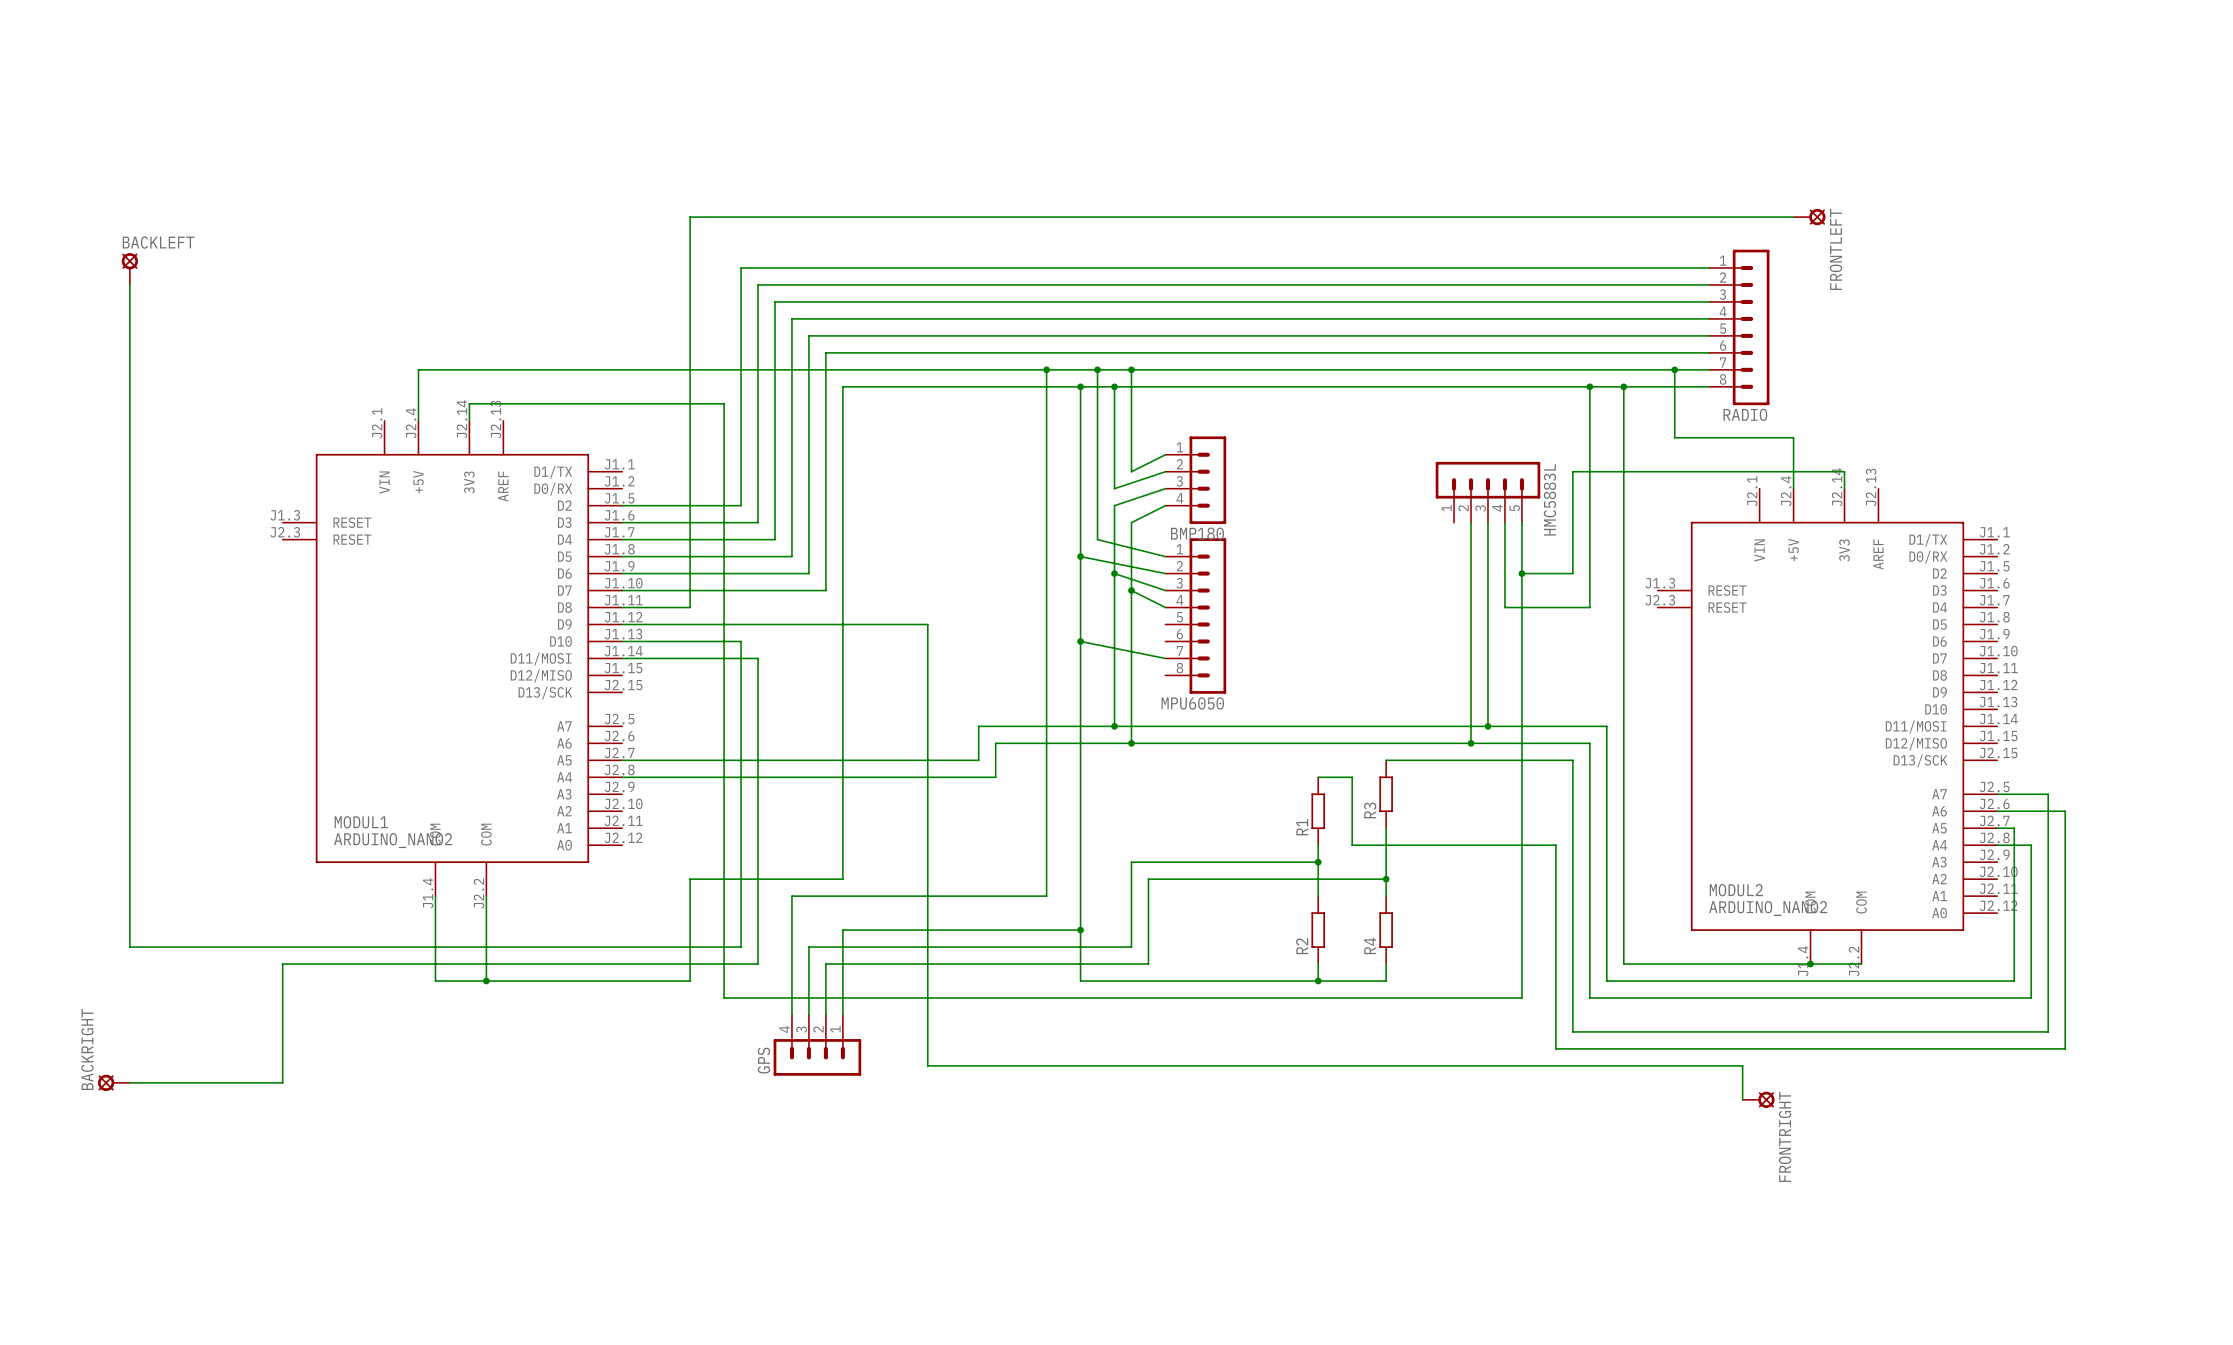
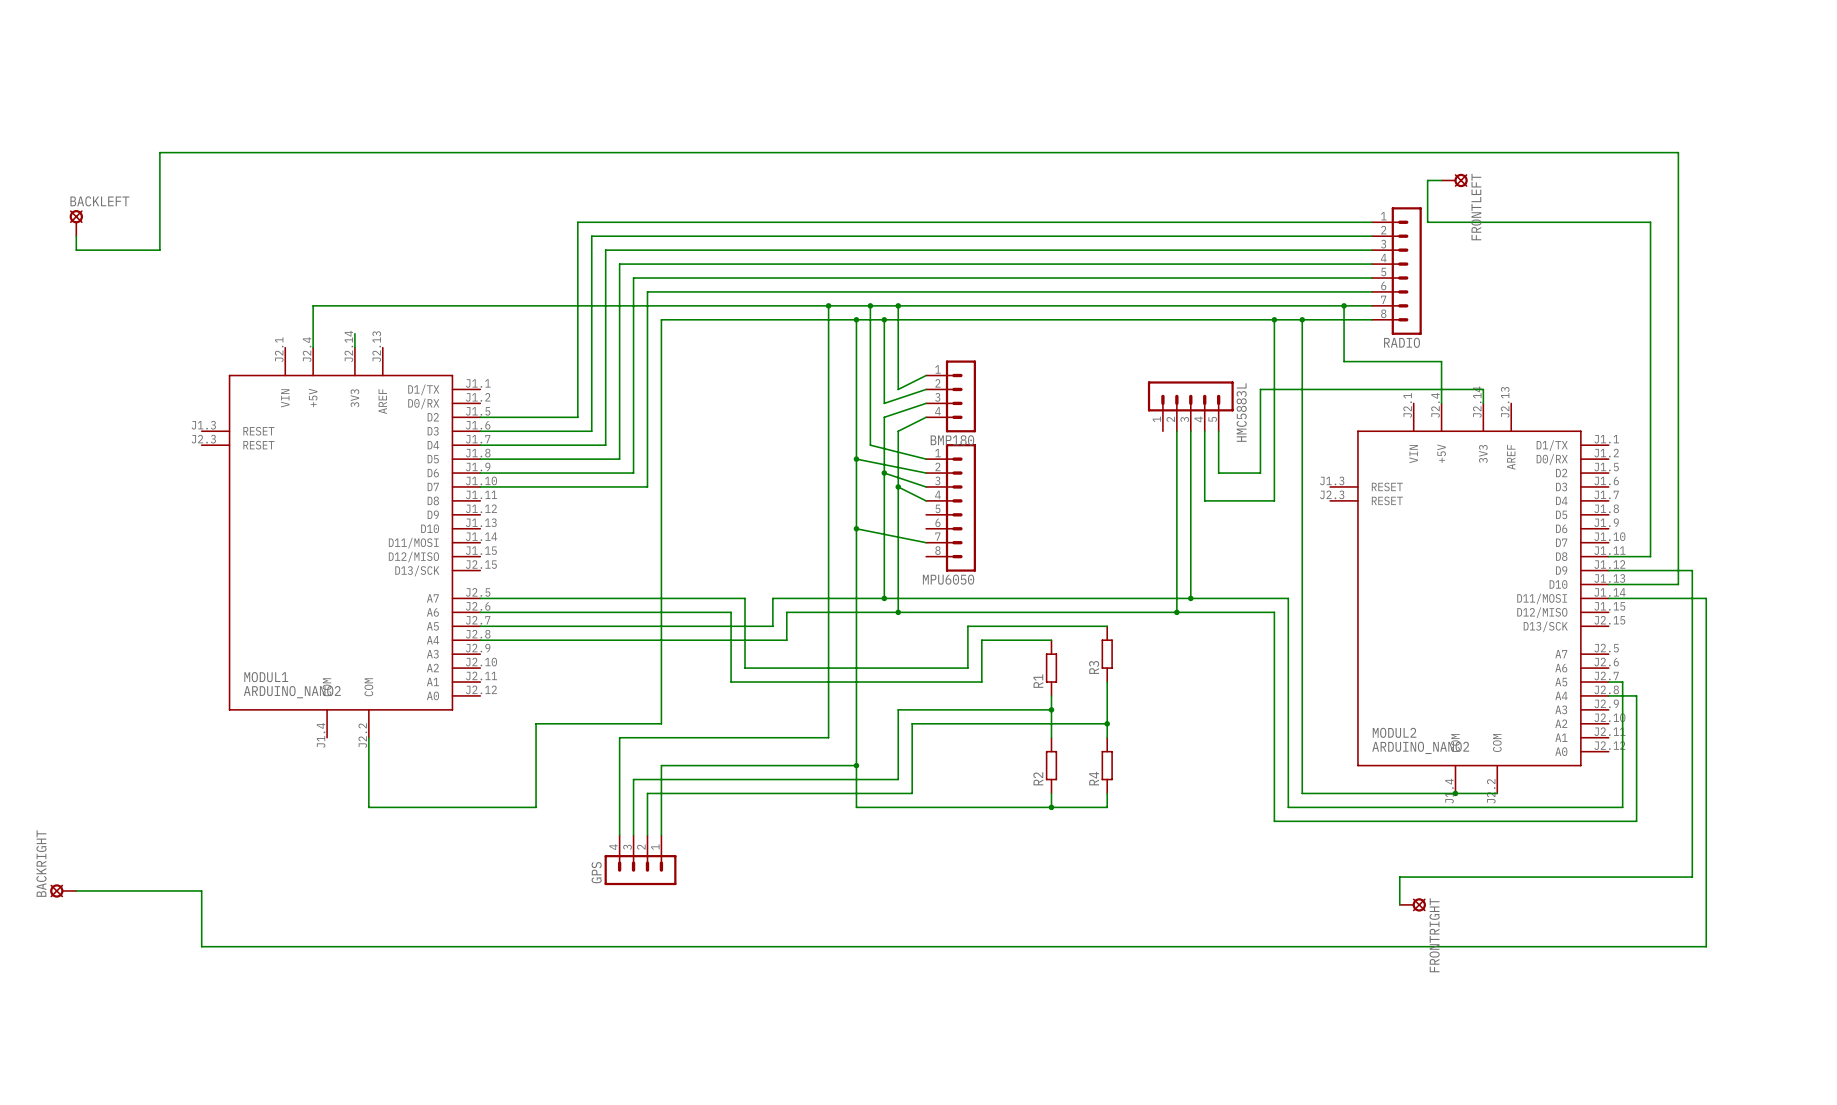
wire: (1776, 217) (690, 217) (690, 607) (622, 607) -> (1427, 180) (1427, 222) (1650, 222) (1650, 556) (1608, 556)
wire: (129, 301) (129, 947) (741, 947) (741, 641) (622, 641) -> (76, 250) (159, 250) (159, 152) (1678, 152) (1678, 584) (1608, 584)
wire: (469, 403) (724, 403) (724, 997) (1521, 997) (1521, 573) -> none
junction: (1521, 573) -> none
wire: (622, 624) (927, 624) (927, 743) -> (480, 612) (731, 612)
wire: (622, 658) (758, 658) (758, 964) (282, 964) (282, 1082) -> (1608, 598) (1706, 598) (1706, 946) (201, 946) (201, 890)
wire: none -> (1608, 570) (1692, 570) (1692, 877) (1399, 877)
wire: (1386, 760) (1572, 760) (1572, 1031) (2048, 1031) (2048, 794) (1997, 794) -> (1107, 626) (967, 626) (967, 668) (745, 668) (745, 598) (480, 598)
wire: (1318, 777) (1352, 777) (1352, 845) (1555, 845) (1555, 1048) (2065, 1048) (2065, 811) (1997, 811) -> none
wire: (927, 828) (927, 1065) (1742, 1065) -> (731, 682) (981, 682) (981, 640) (1051, 640)
wire: (435, 896) (435, 981) (486, 981) -> none
junction: (486, 981) -> none

